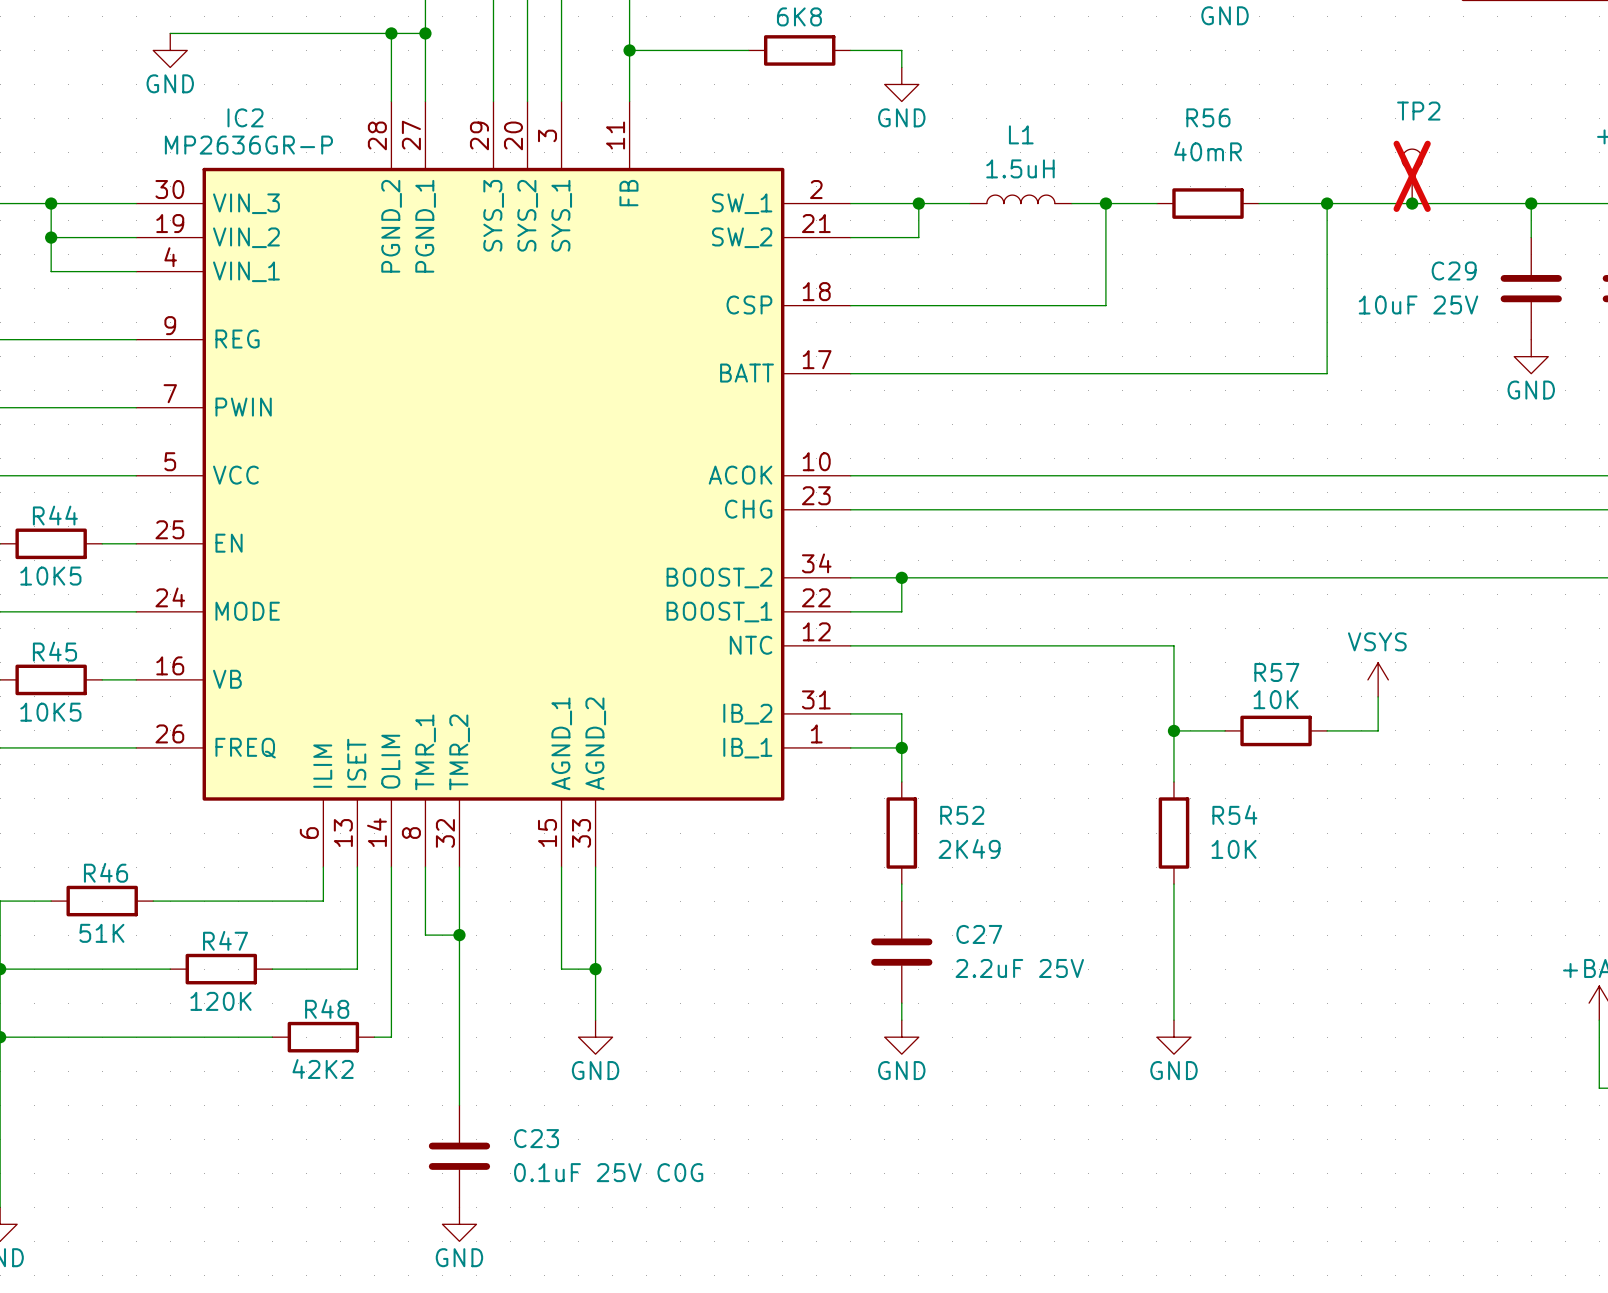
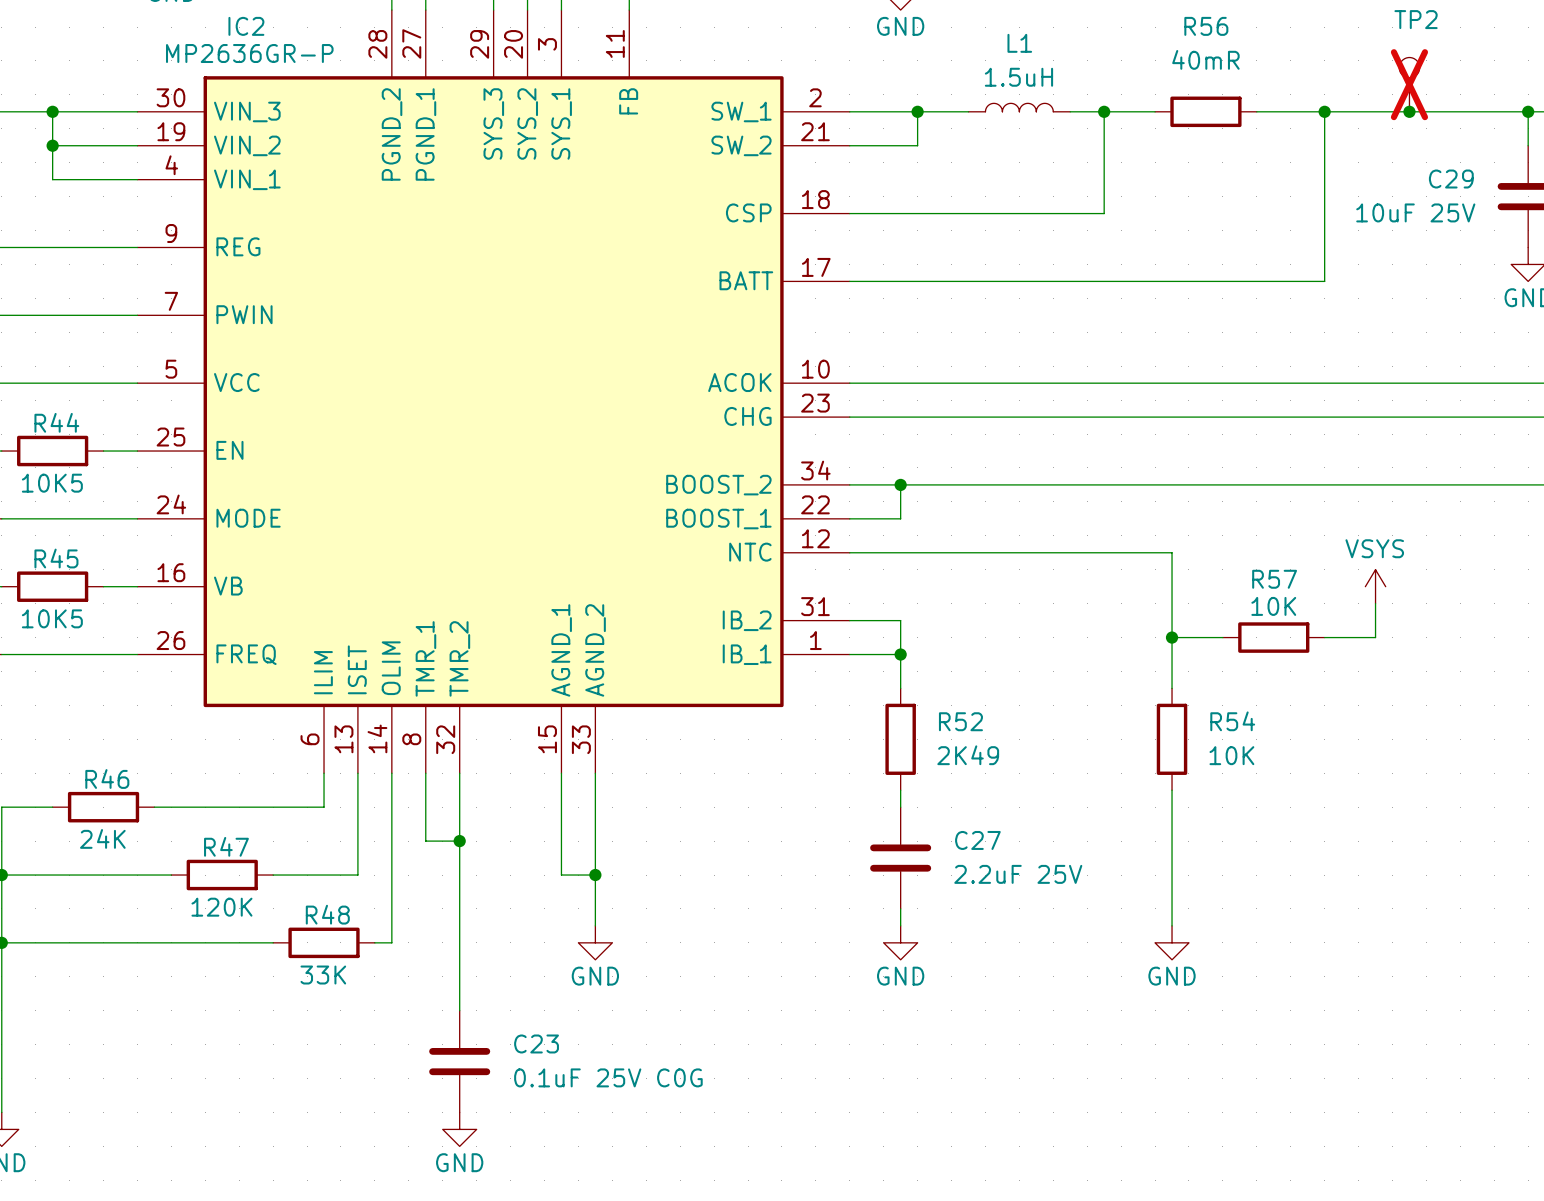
R46 value: 51K (101, 933) -> 24K (102, 838)
R48 value: 42K2 (323, 1069) -> 33K (323, 975)

